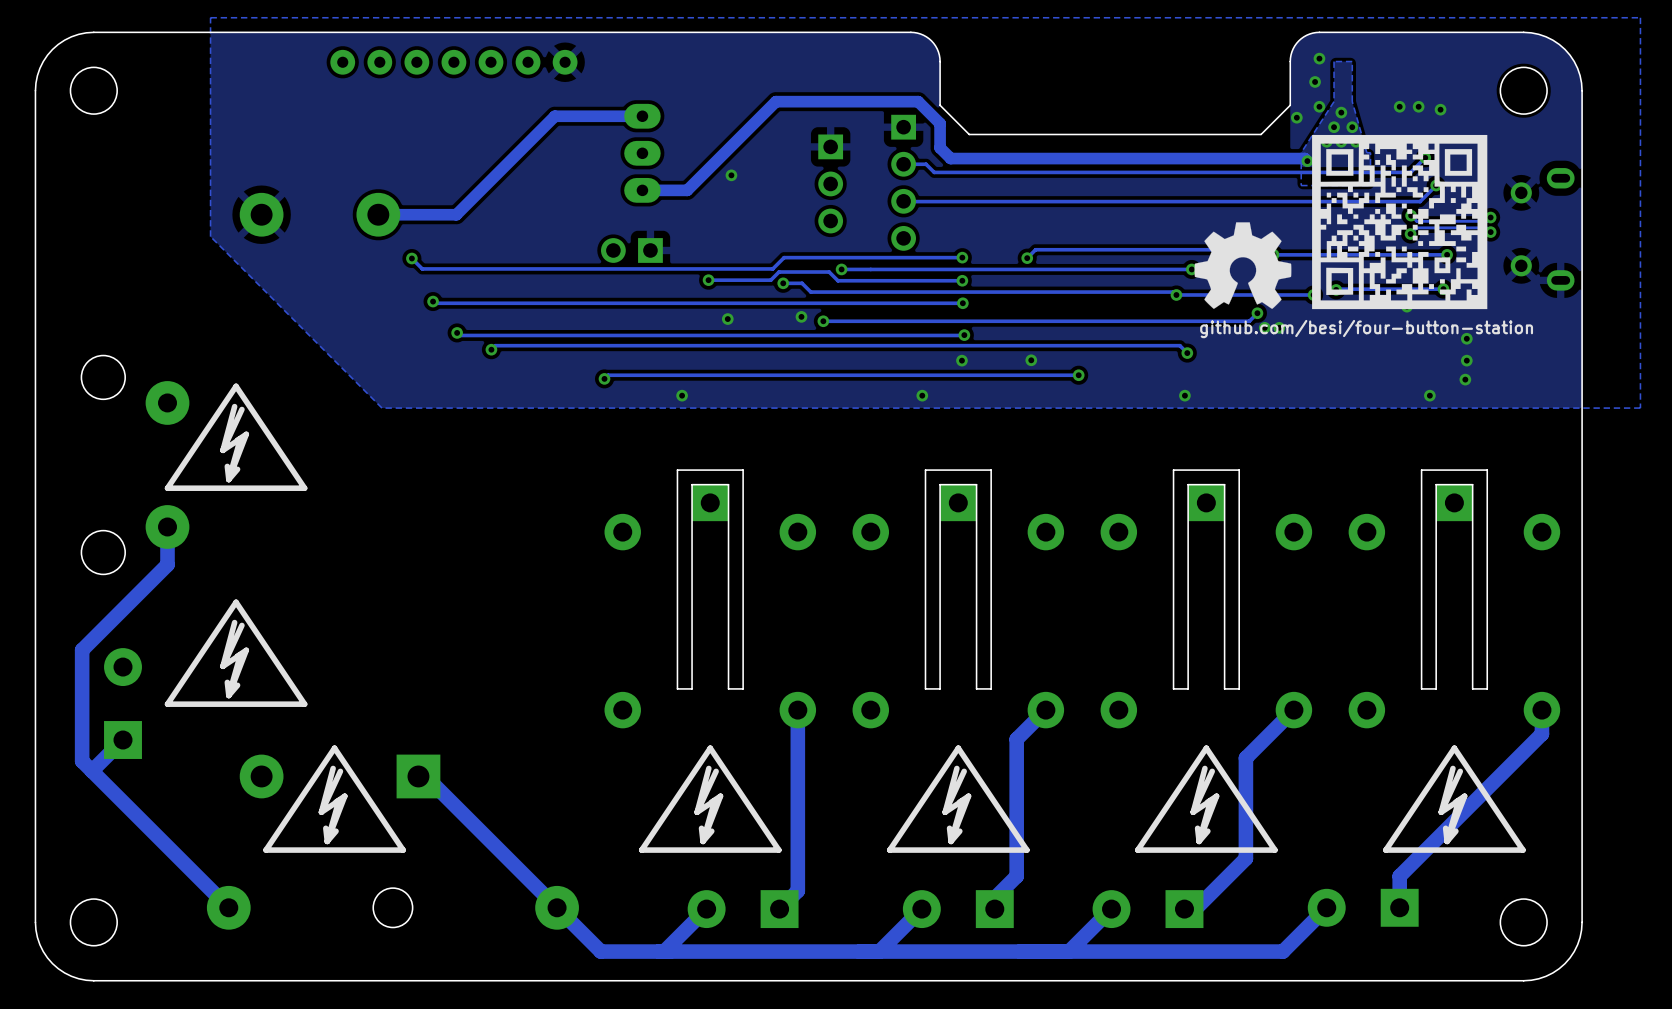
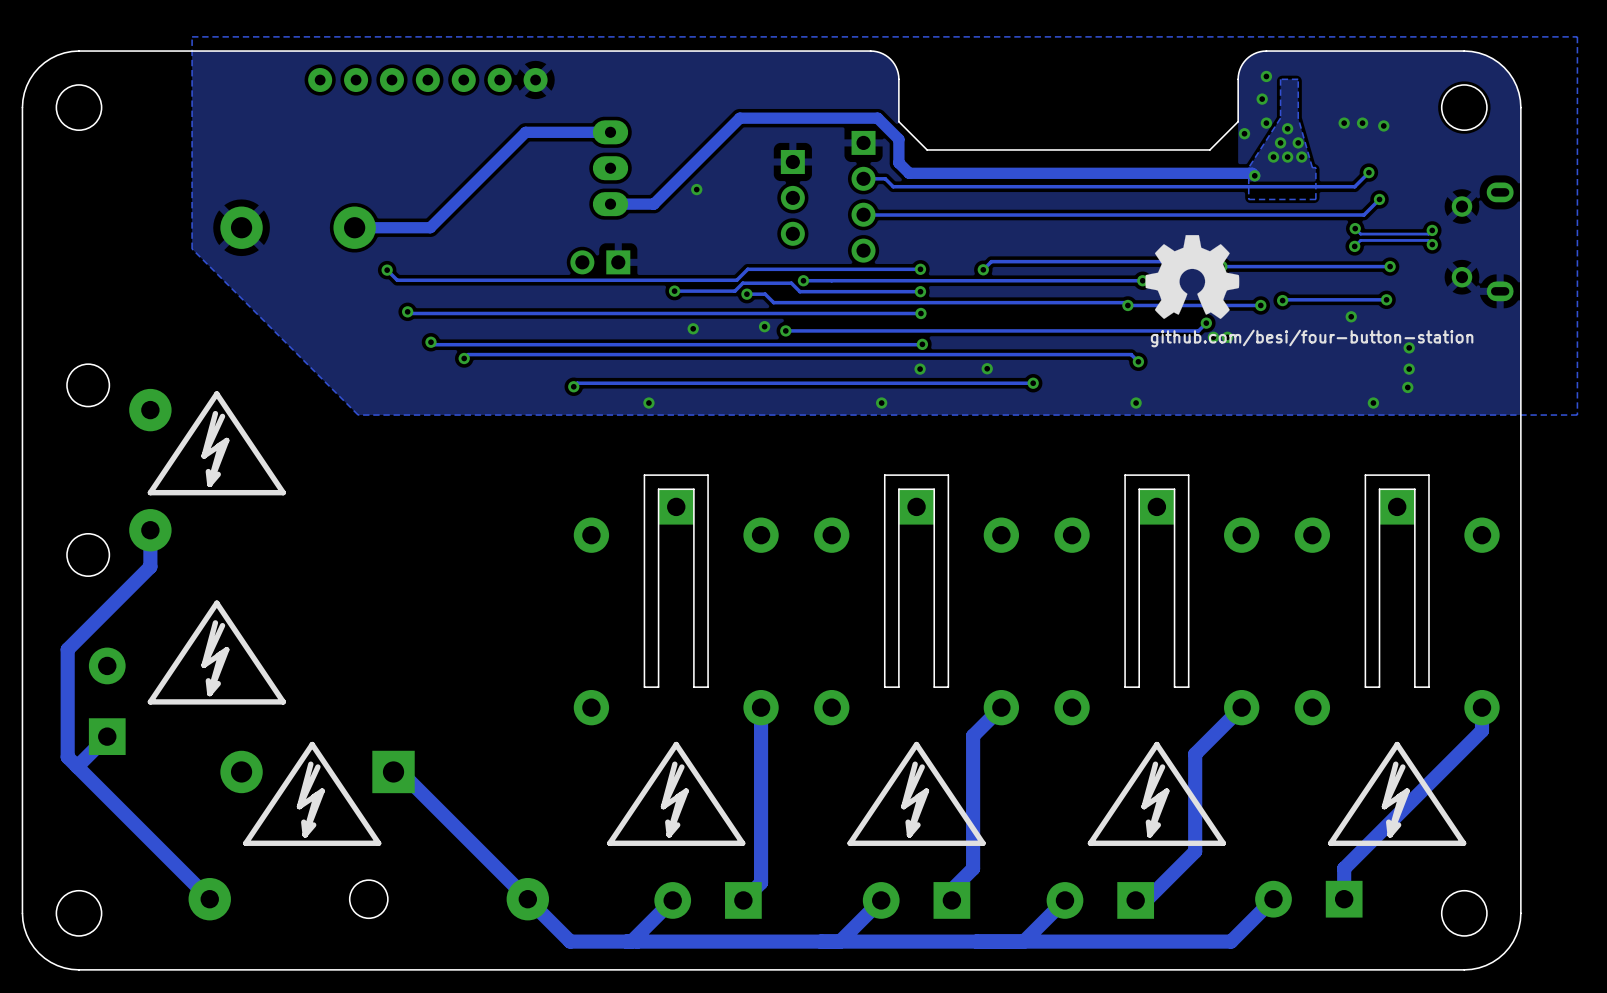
drawing: [1312, 134, 1488, 310] -> none

